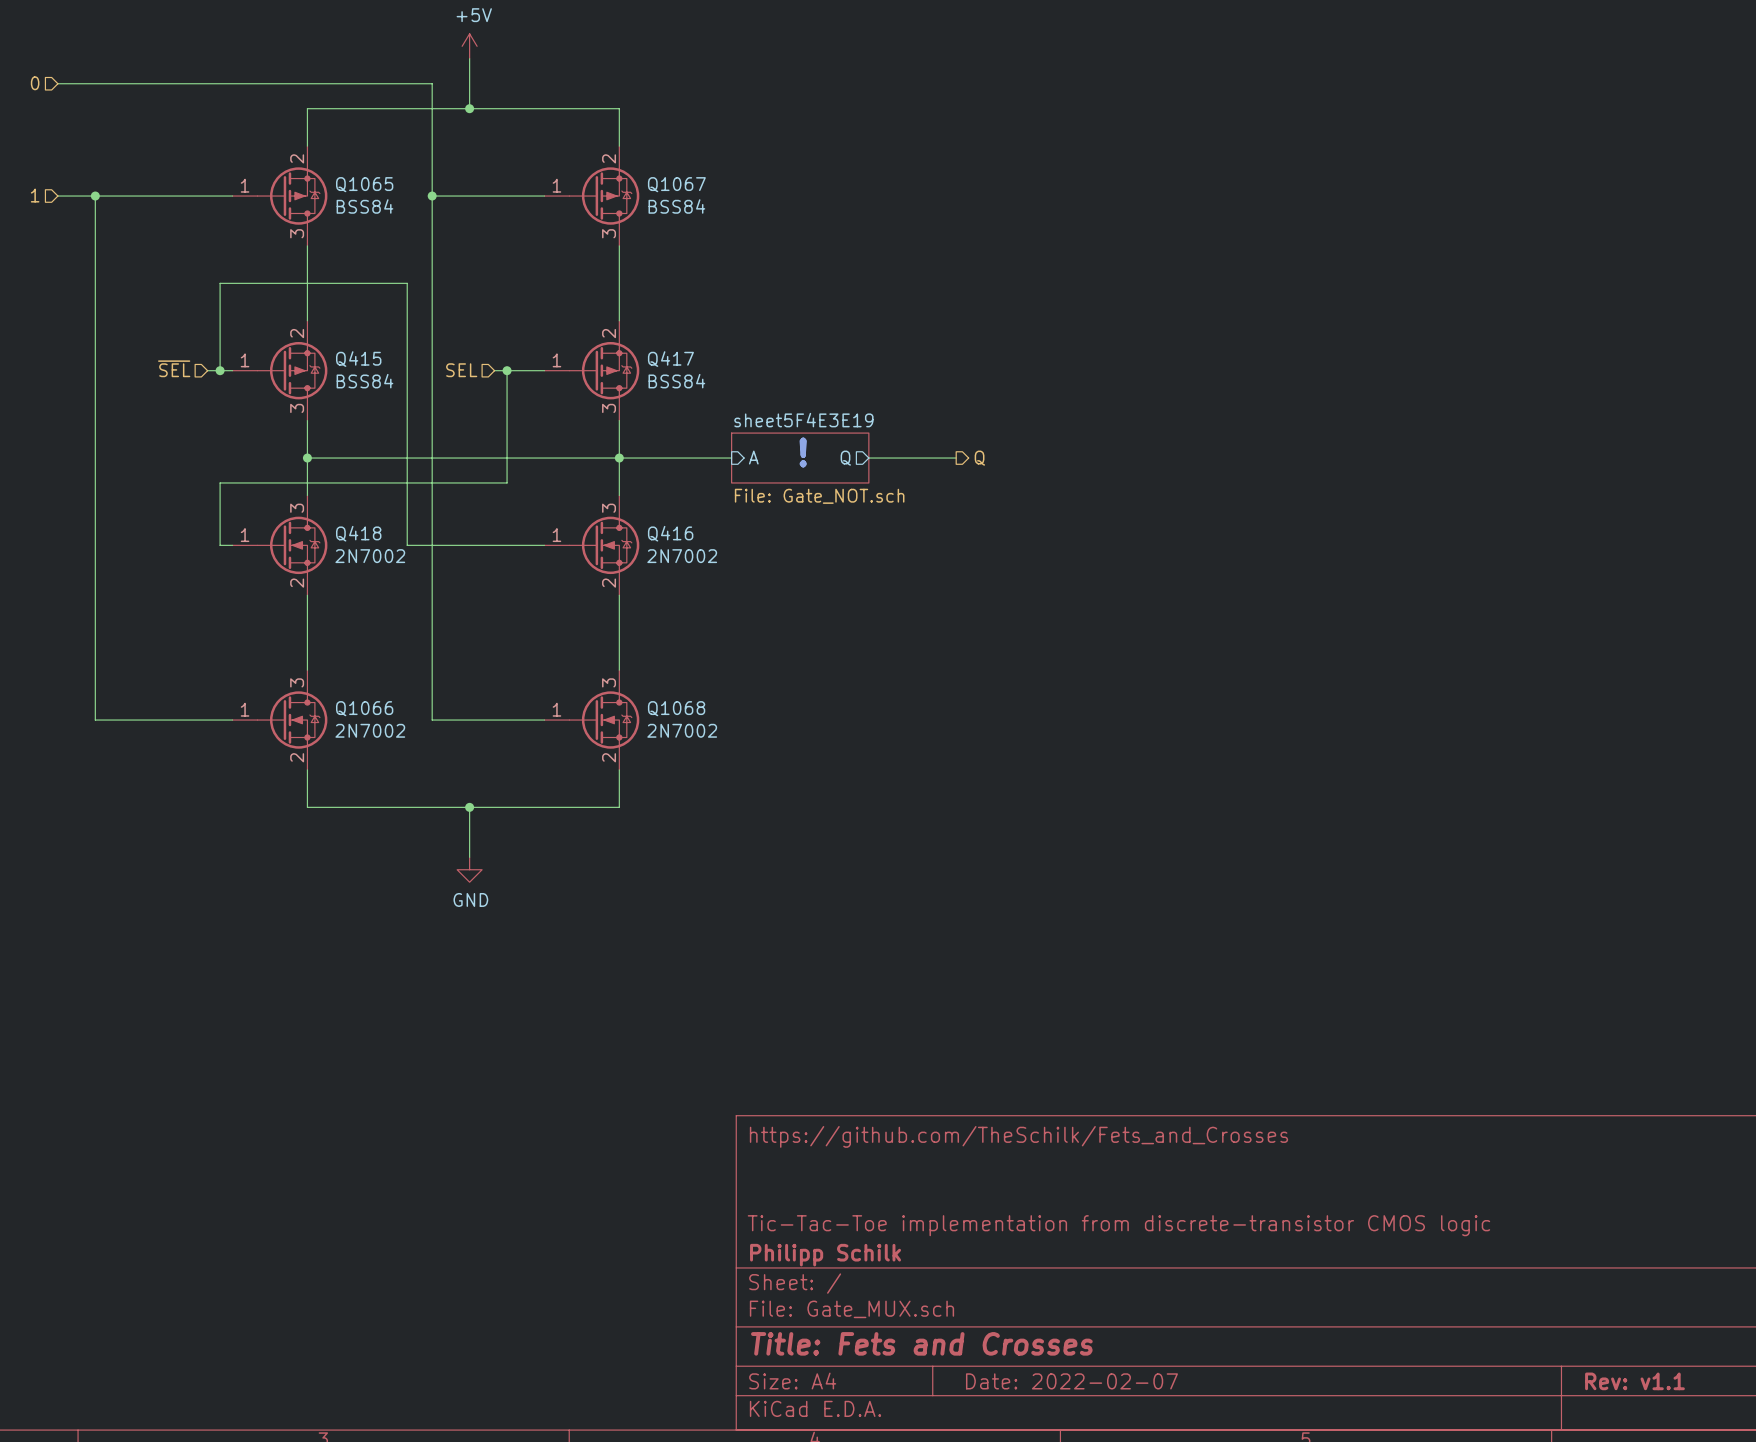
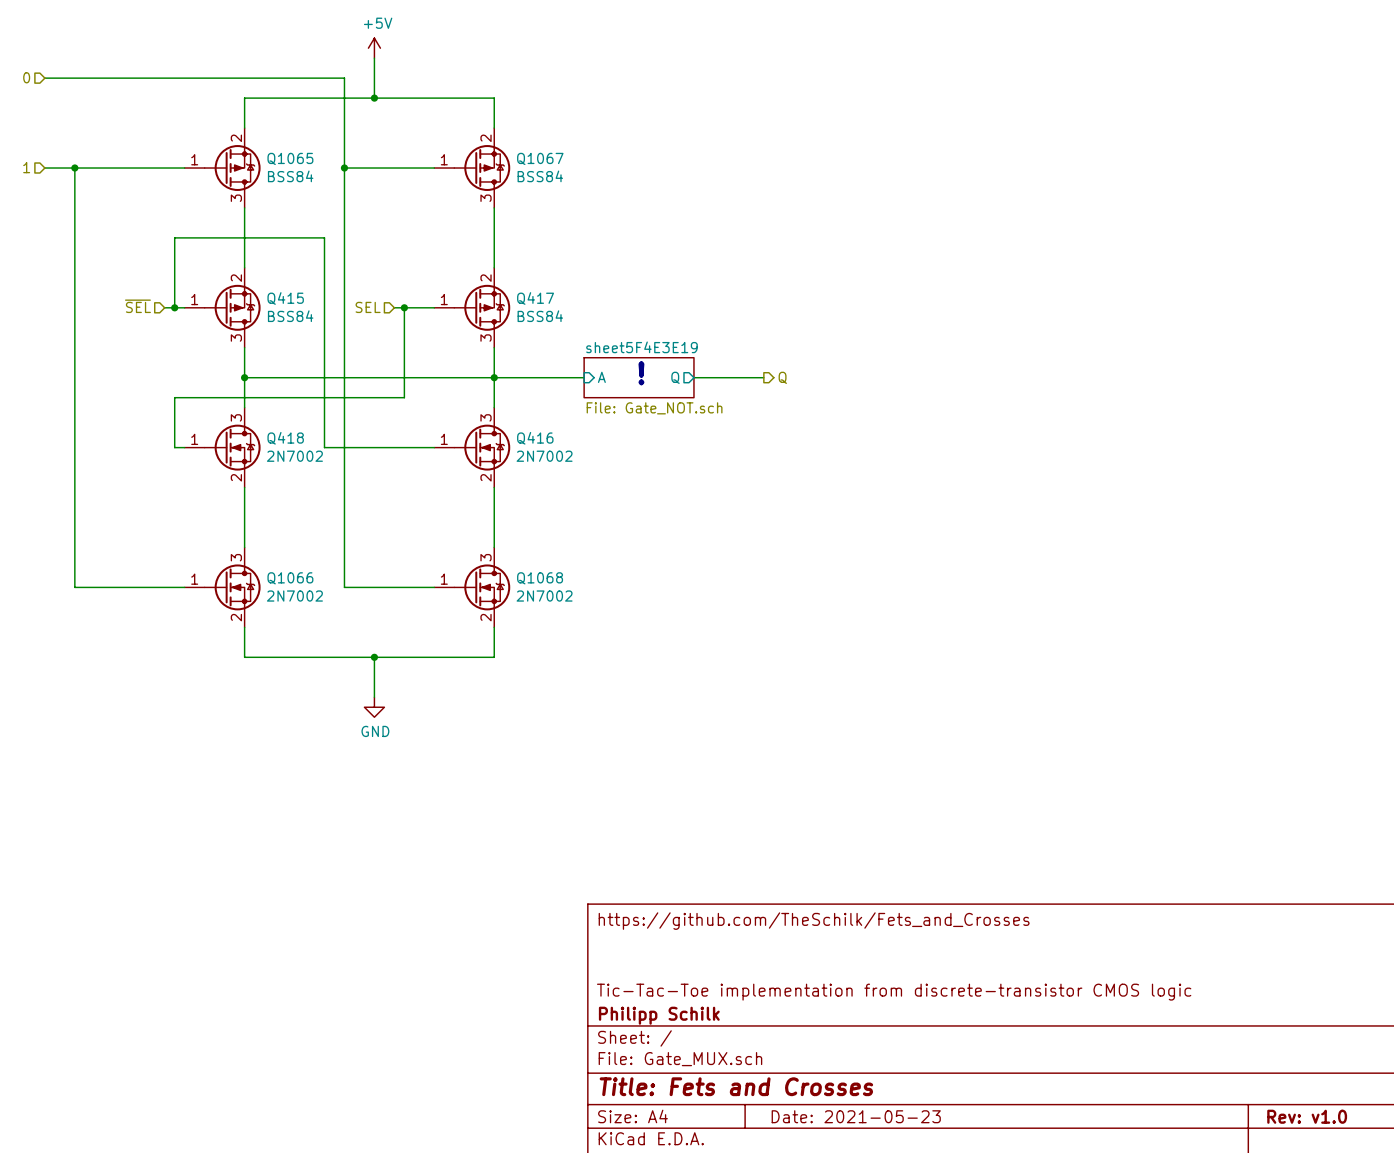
title block: Date: 2022-02-07 (1071, 1381) -> Date: 2021-05-23 (856, 1116)
title block: Rev: v1.1 (1634, 1381) -> Rev: v1.0 (1307, 1116)

